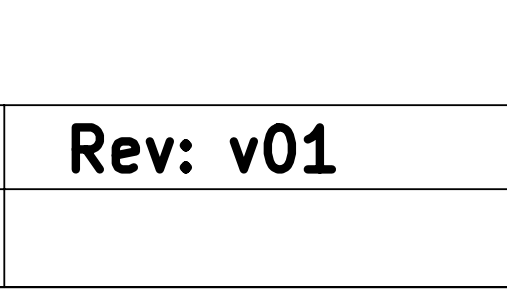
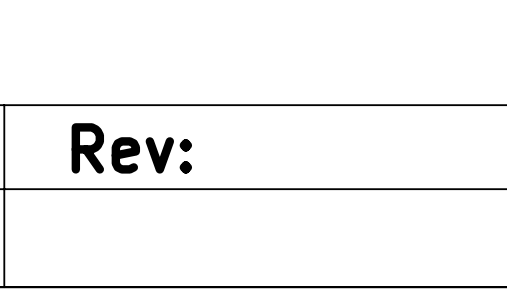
title block: Rev: v01 (203, 148) -> Rev: (131, 148)

